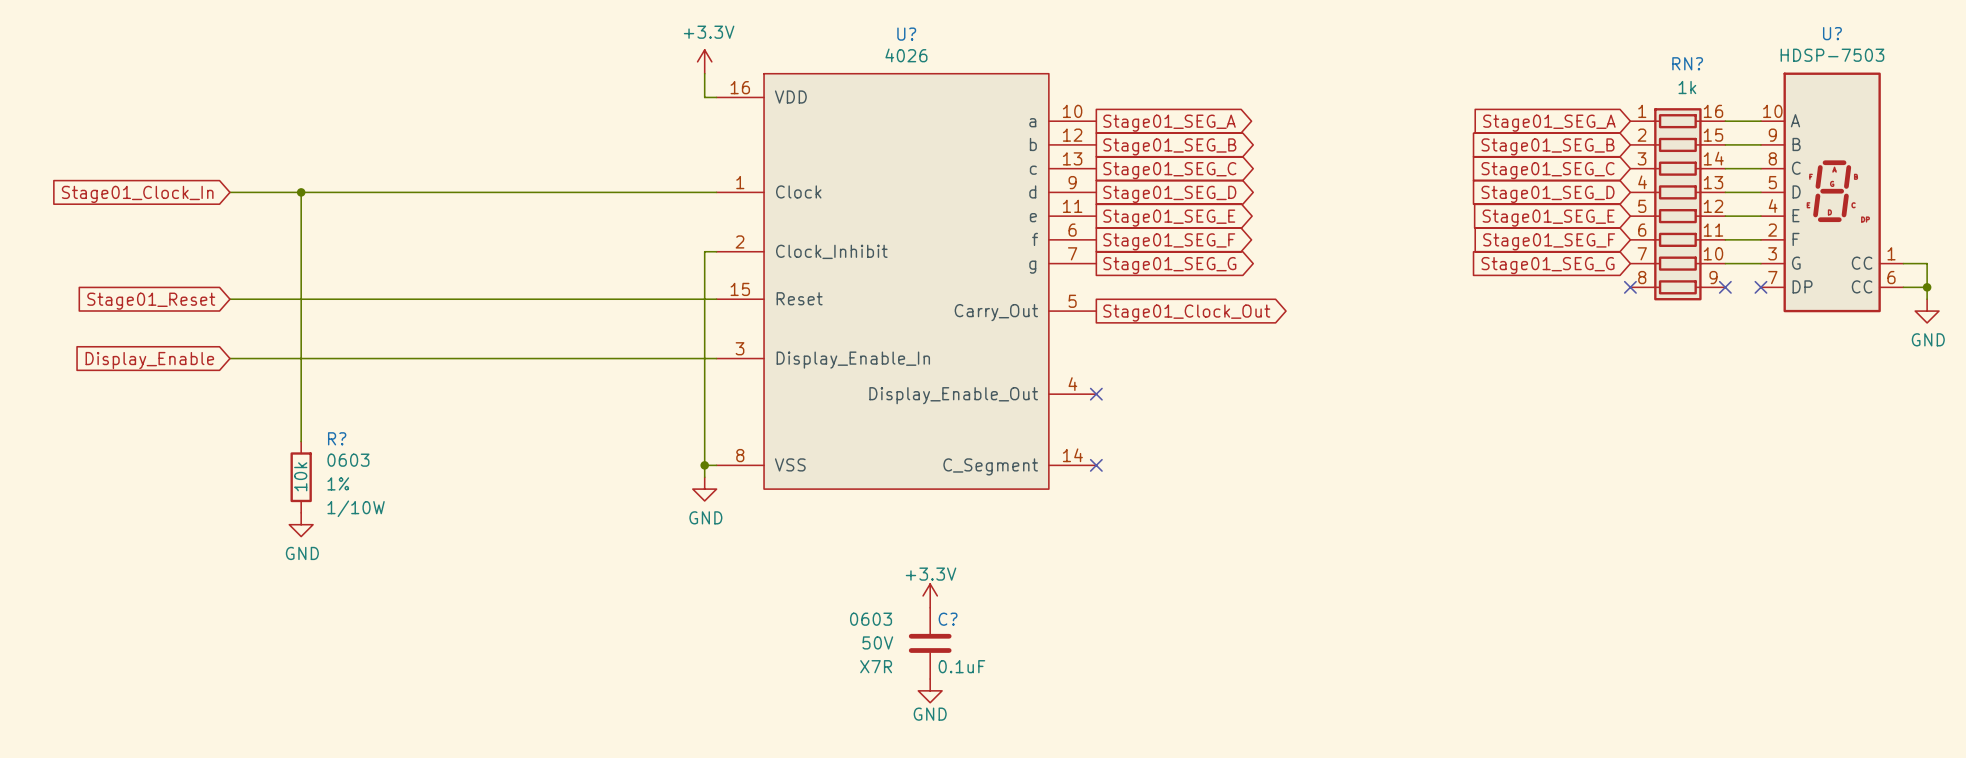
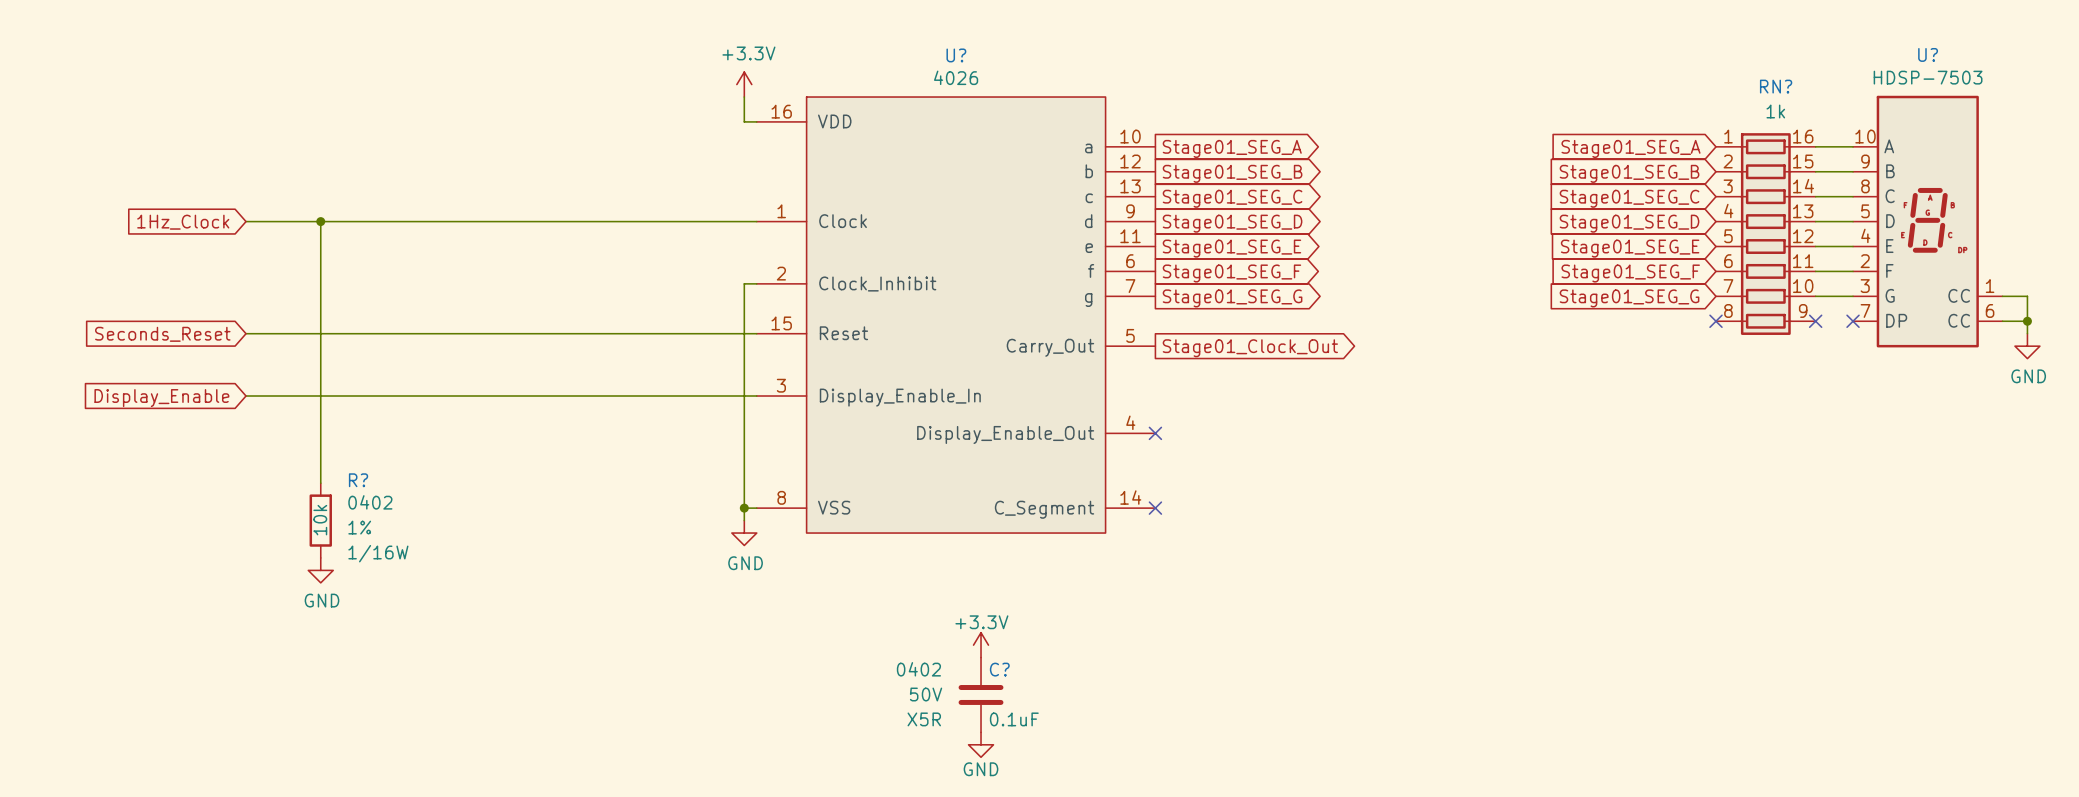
global label: Stage01_Clock_In (137, 194) -> 1Hz_Clock (183, 222)
global label: Stage01_Reset (151, 301) -> Seconds_Reset (162, 334)
R? text: 0603 (348, 460) -> 0402 (370, 502)
R? text: 1/10W (356, 508) -> 1/16W (378, 553)
C? text: 0603 (871, 619) -> 0402 (918, 669)
C? text: X7R (876, 666) -> X5R (924, 719)

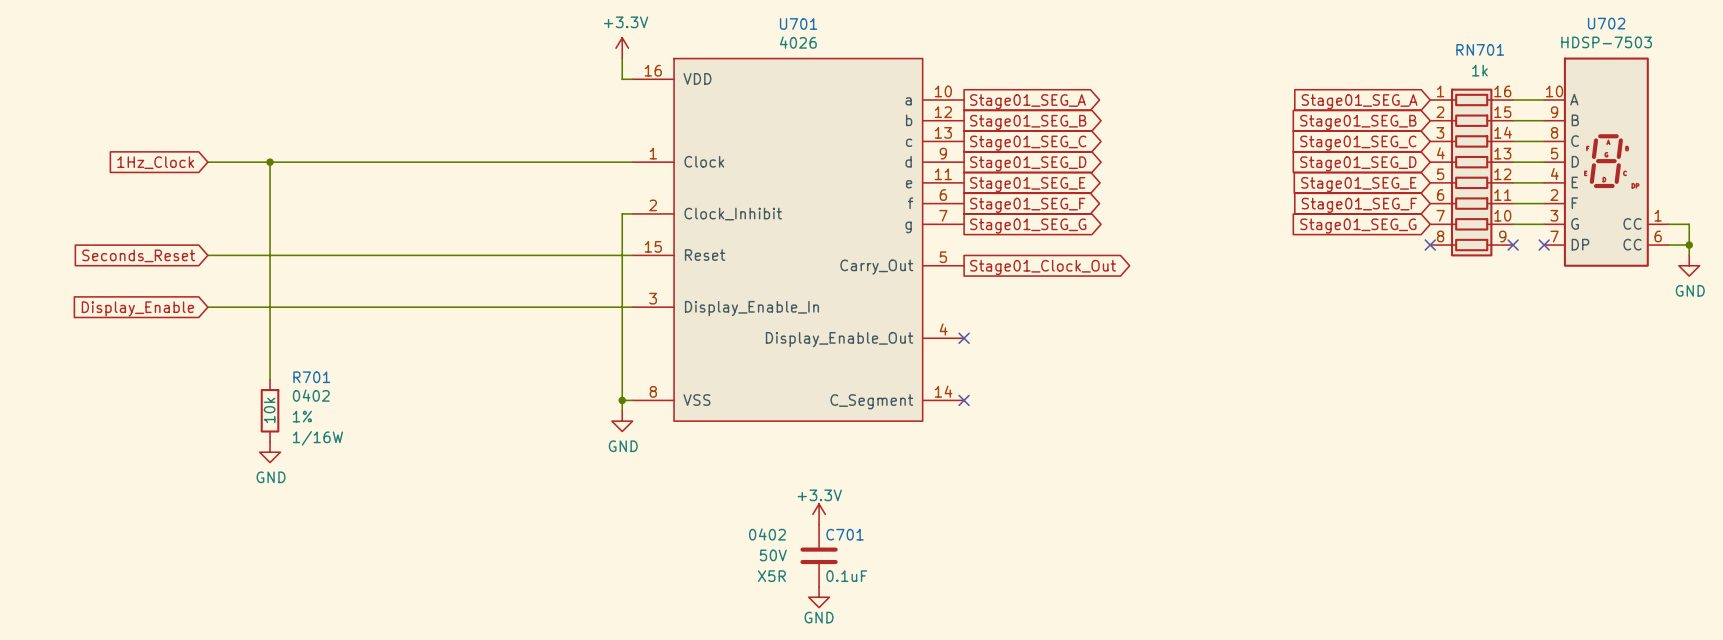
U? name: U? (1928, 54) -> U702 (1606, 23)
U? name: U? (956, 55) -> U701 (798, 23)
RN? name: RN? (1776, 86) -> RN701 (1480, 49)
R? name: R? (358, 480) -> R701 (311, 377)
C? name: C? (999, 669) -> C701 (845, 534)

